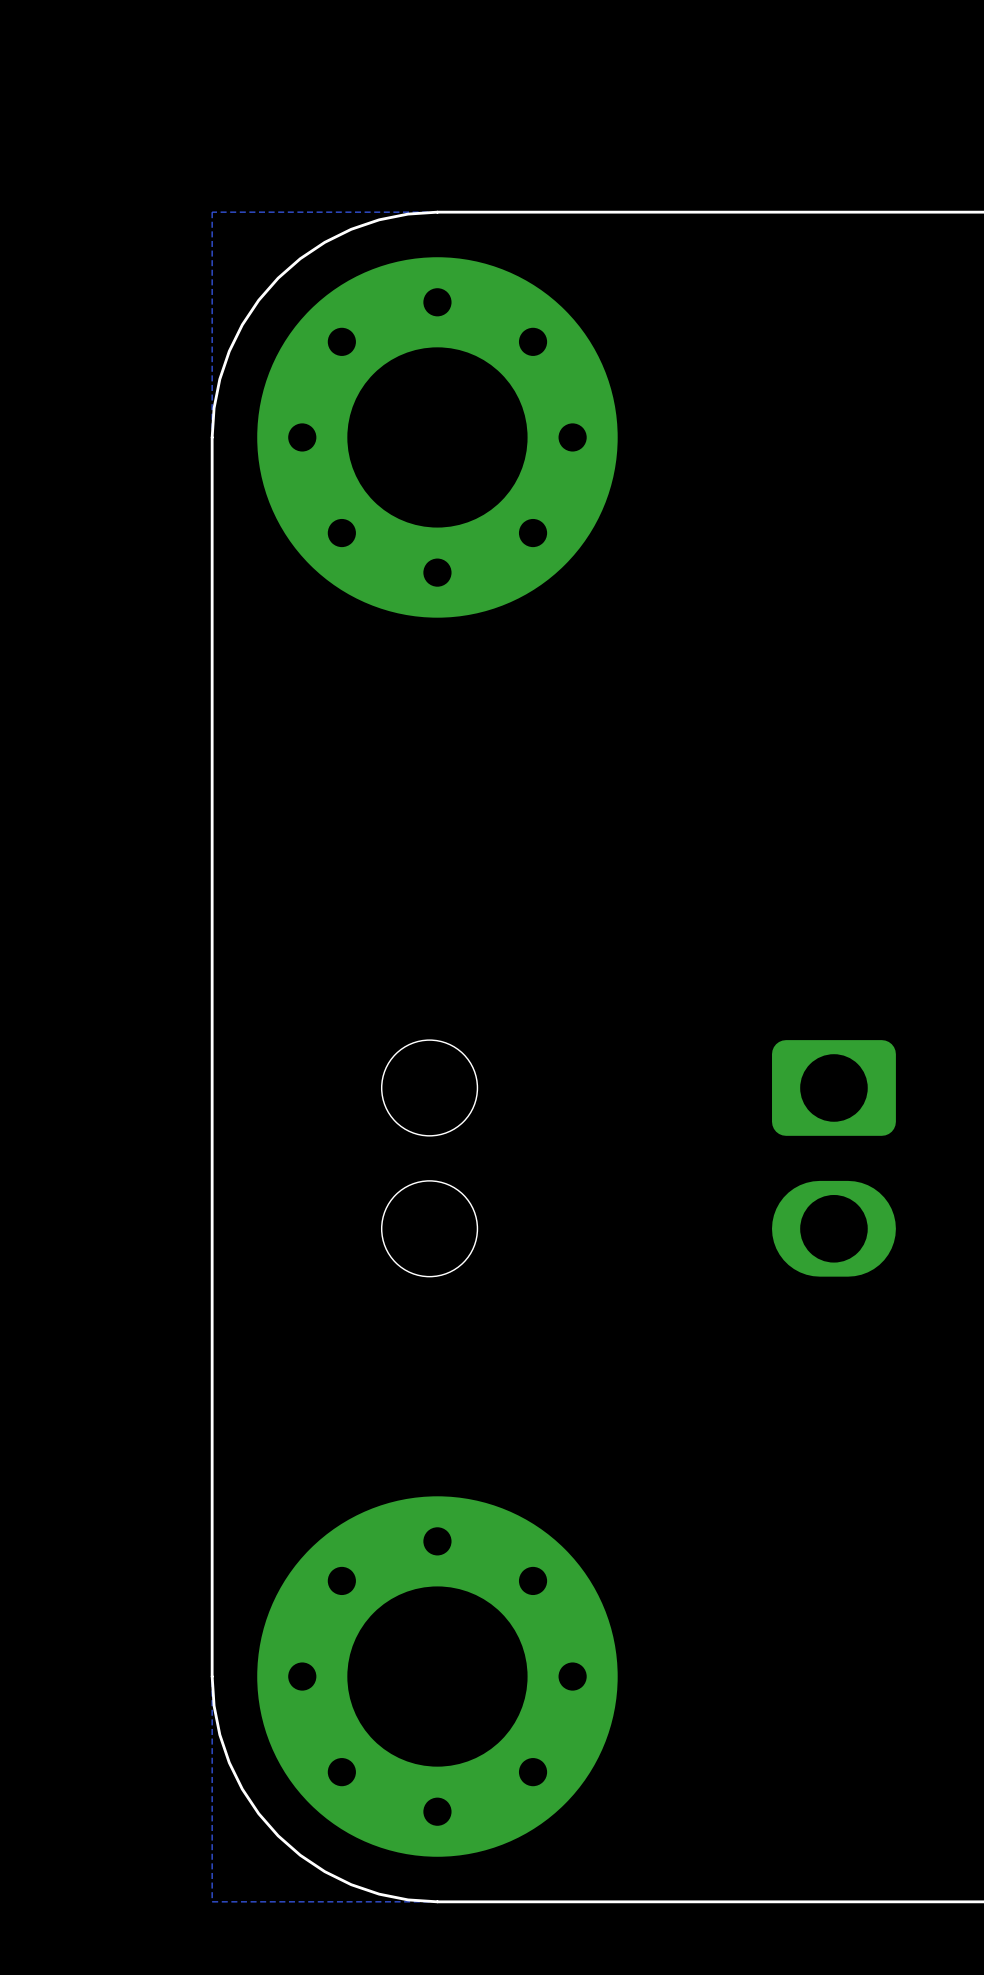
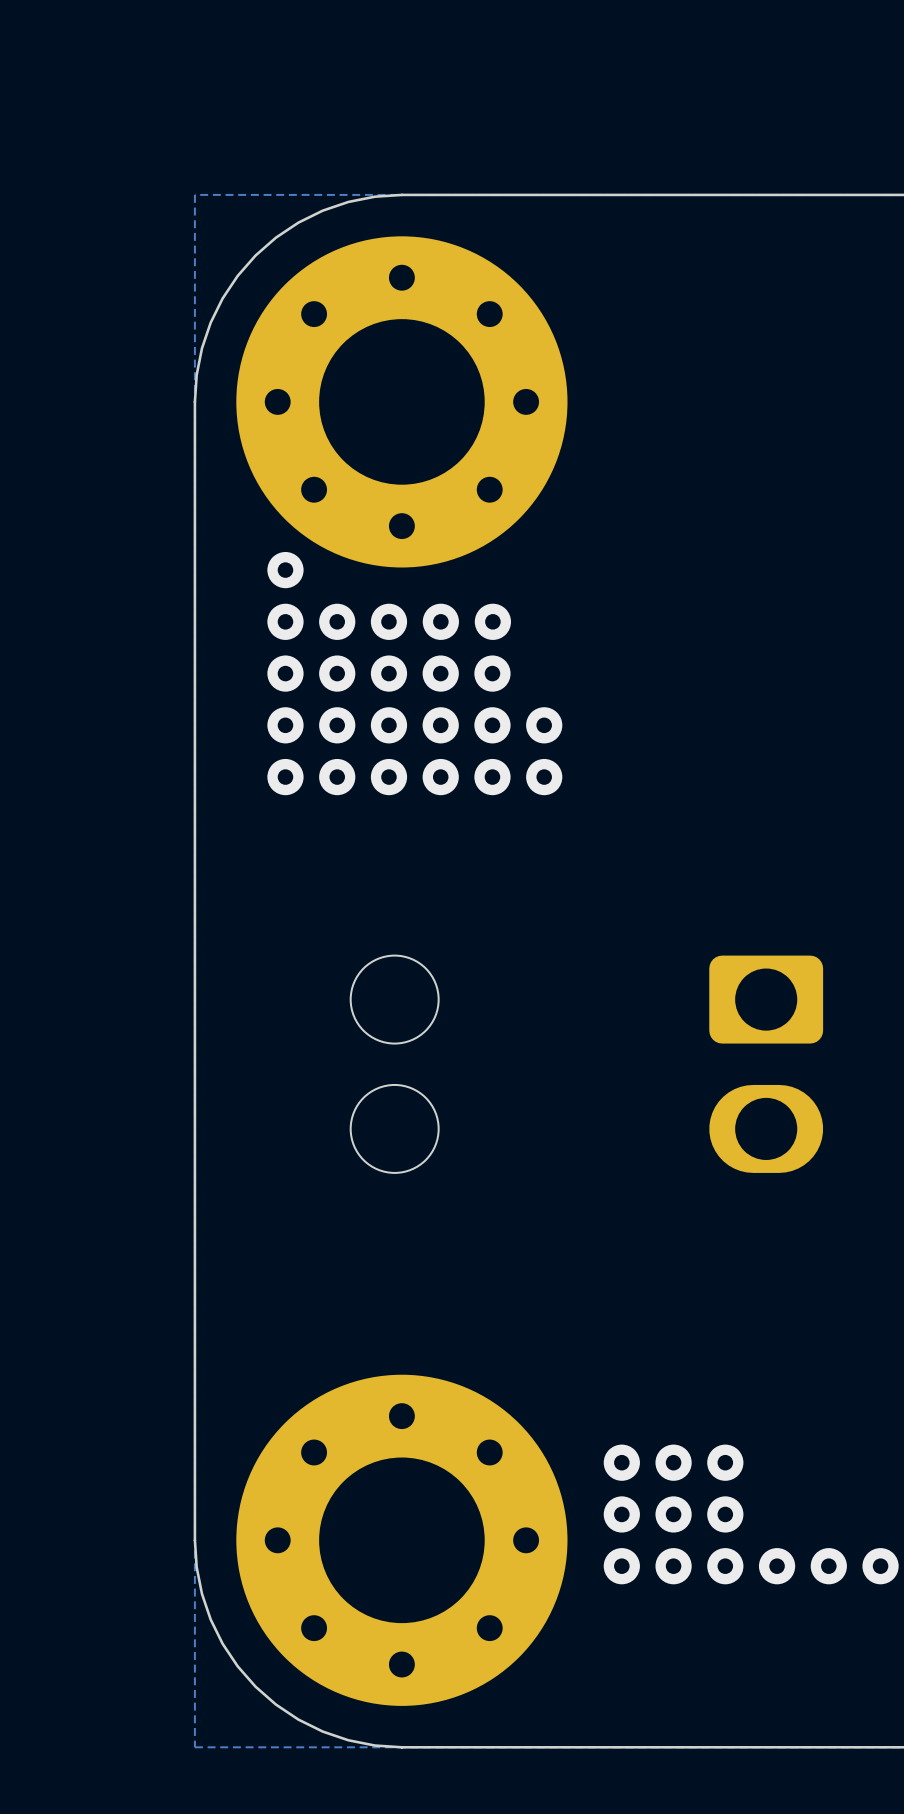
via: none -> (285, 570)
via: none -> (285, 621)
via: none -> (337, 621)
via: none -> (388, 621)
via: none -> (440, 621)
via: none -> (492, 621)
via: none -> (285, 673)
via: none -> (337, 673)
via: none -> (388, 673)
via: none -> (440, 673)
via: none -> (492, 673)
via: none -> (285, 725)
via: none -> (337, 725)
via: none -> (388, 725)
via: none -> (440, 725)
via: none -> (492, 725)
via: none -> (544, 725)
via: none -> (285, 777)
via: none -> (337, 777)
via: none -> (388, 777)
via: none -> (440, 777)
via: none -> (492, 777)
via: none -> (544, 777)
via: none -> (621, 1462)
via: none -> (673, 1462)
via: none -> (725, 1462)
via: none -> (621, 1514)
via: none -> (673, 1514)
via: none -> (725, 1514)
via: none -> (621, 1566)
via: none -> (673, 1566)
via: none -> (725, 1566)
via: none -> (777, 1566)
via: none -> (828, 1566)
via: none -> (880, 1566)

